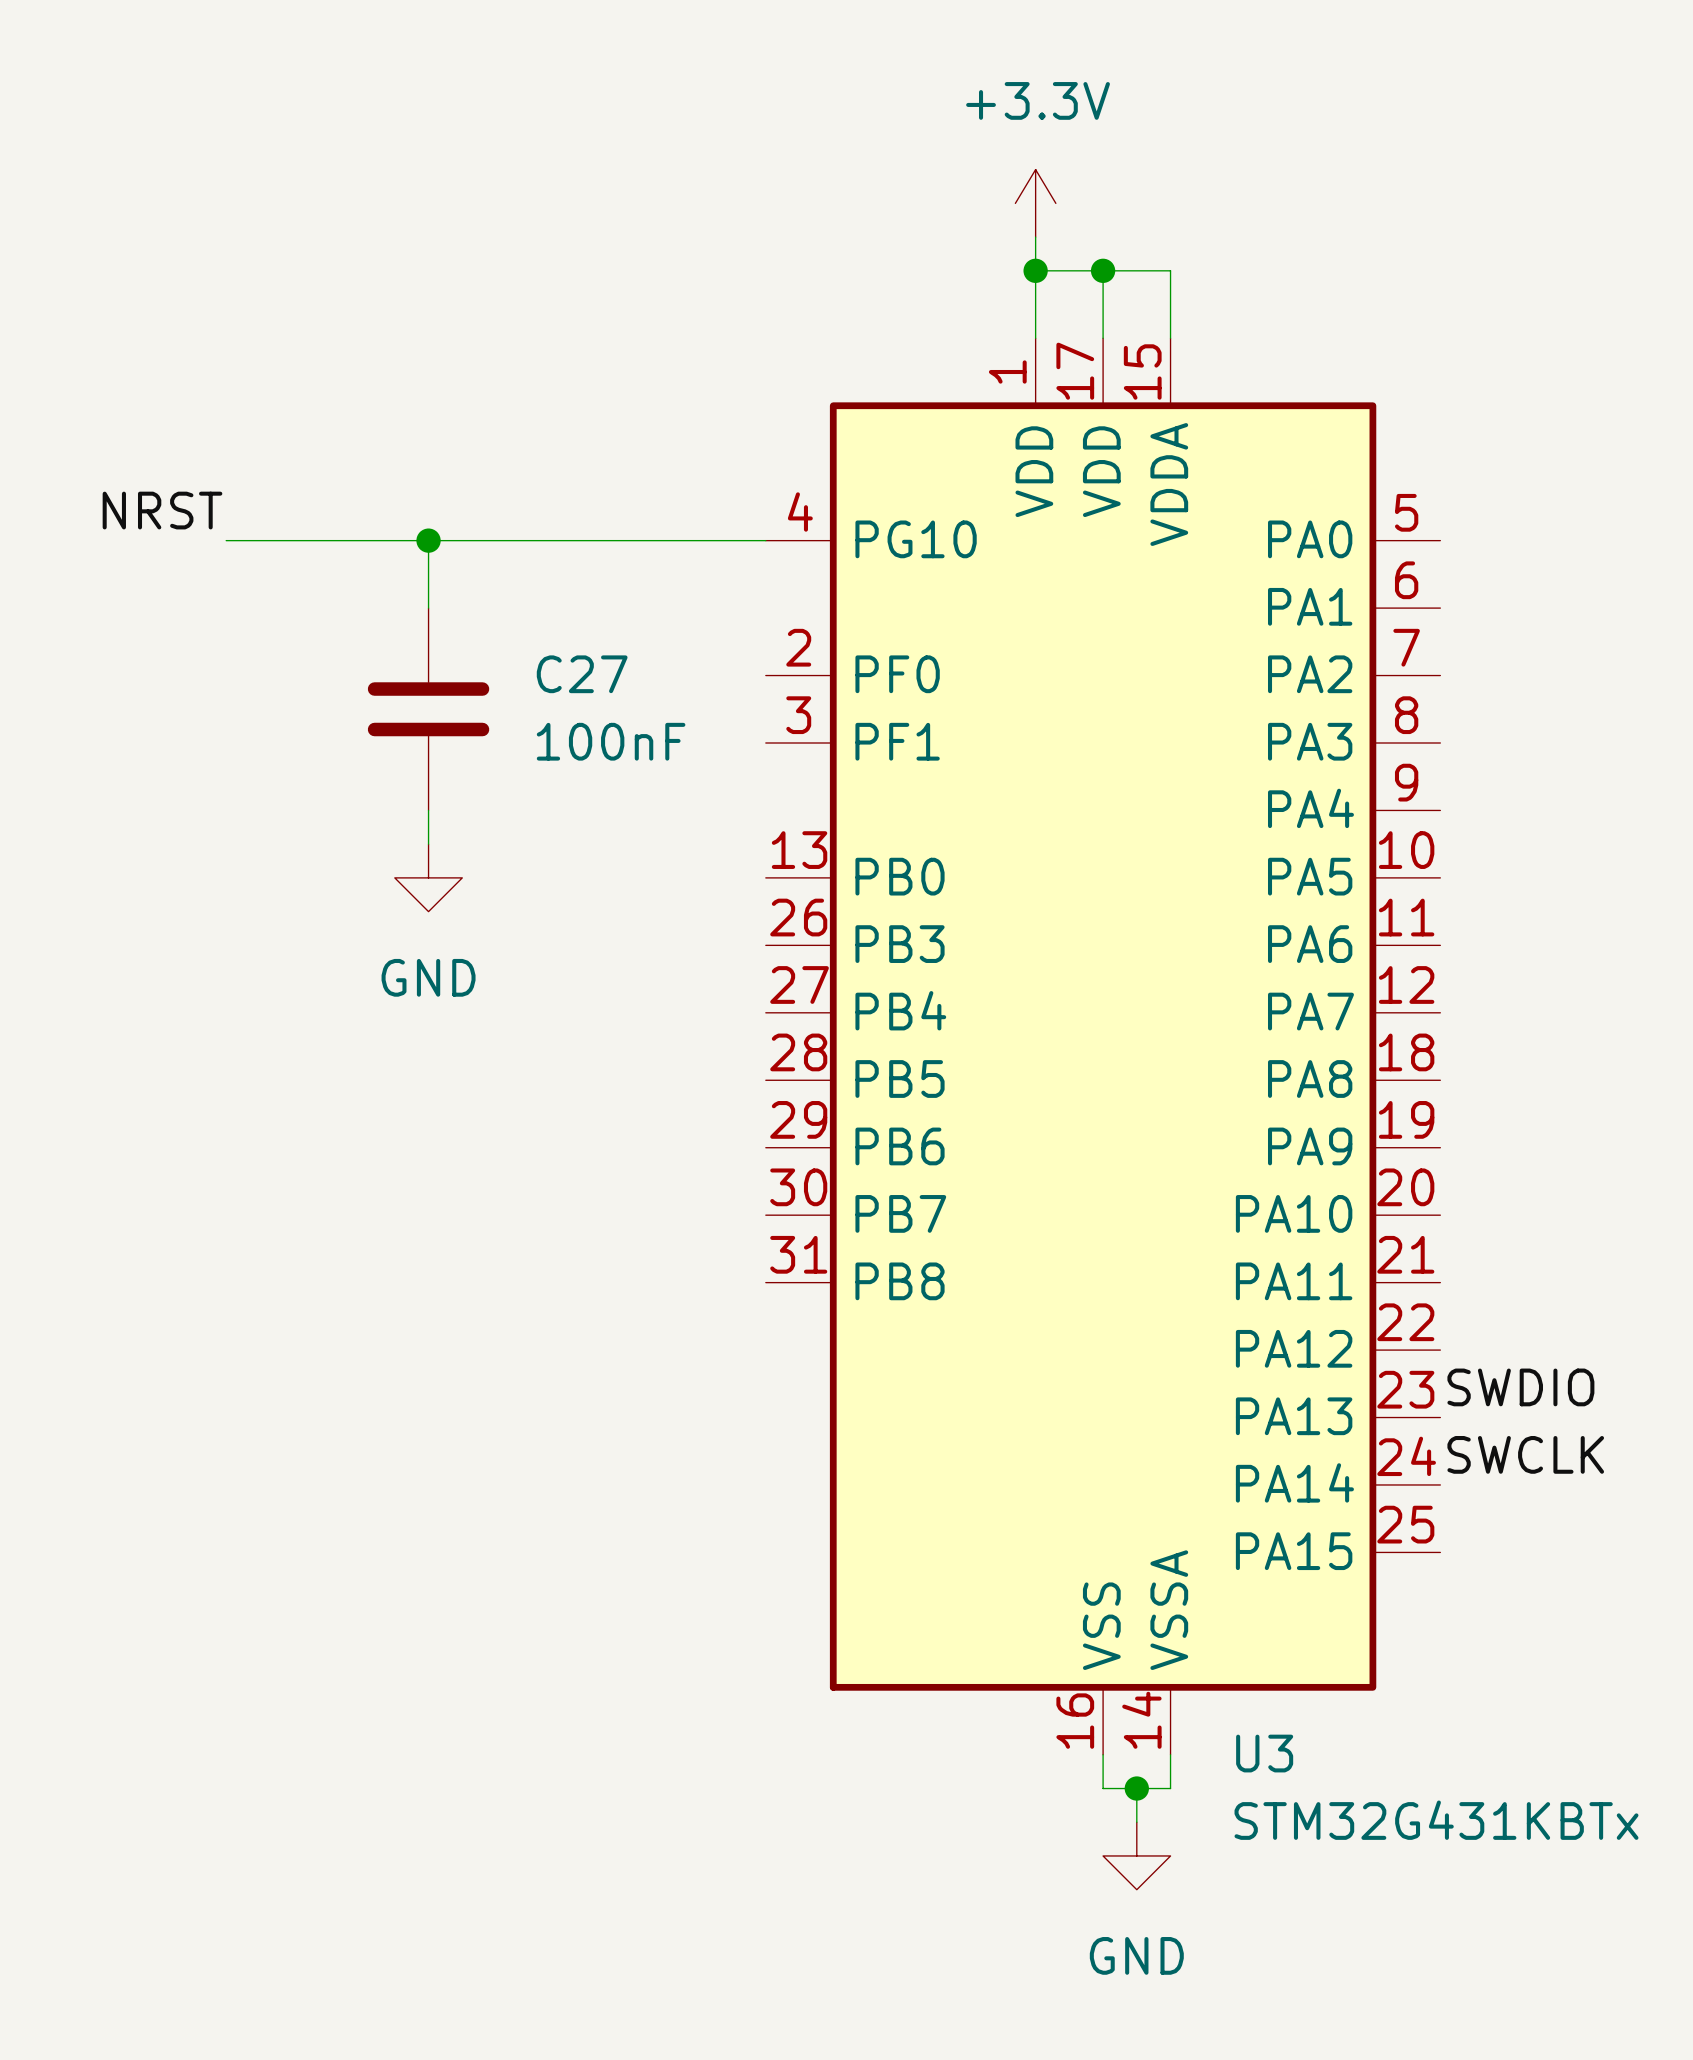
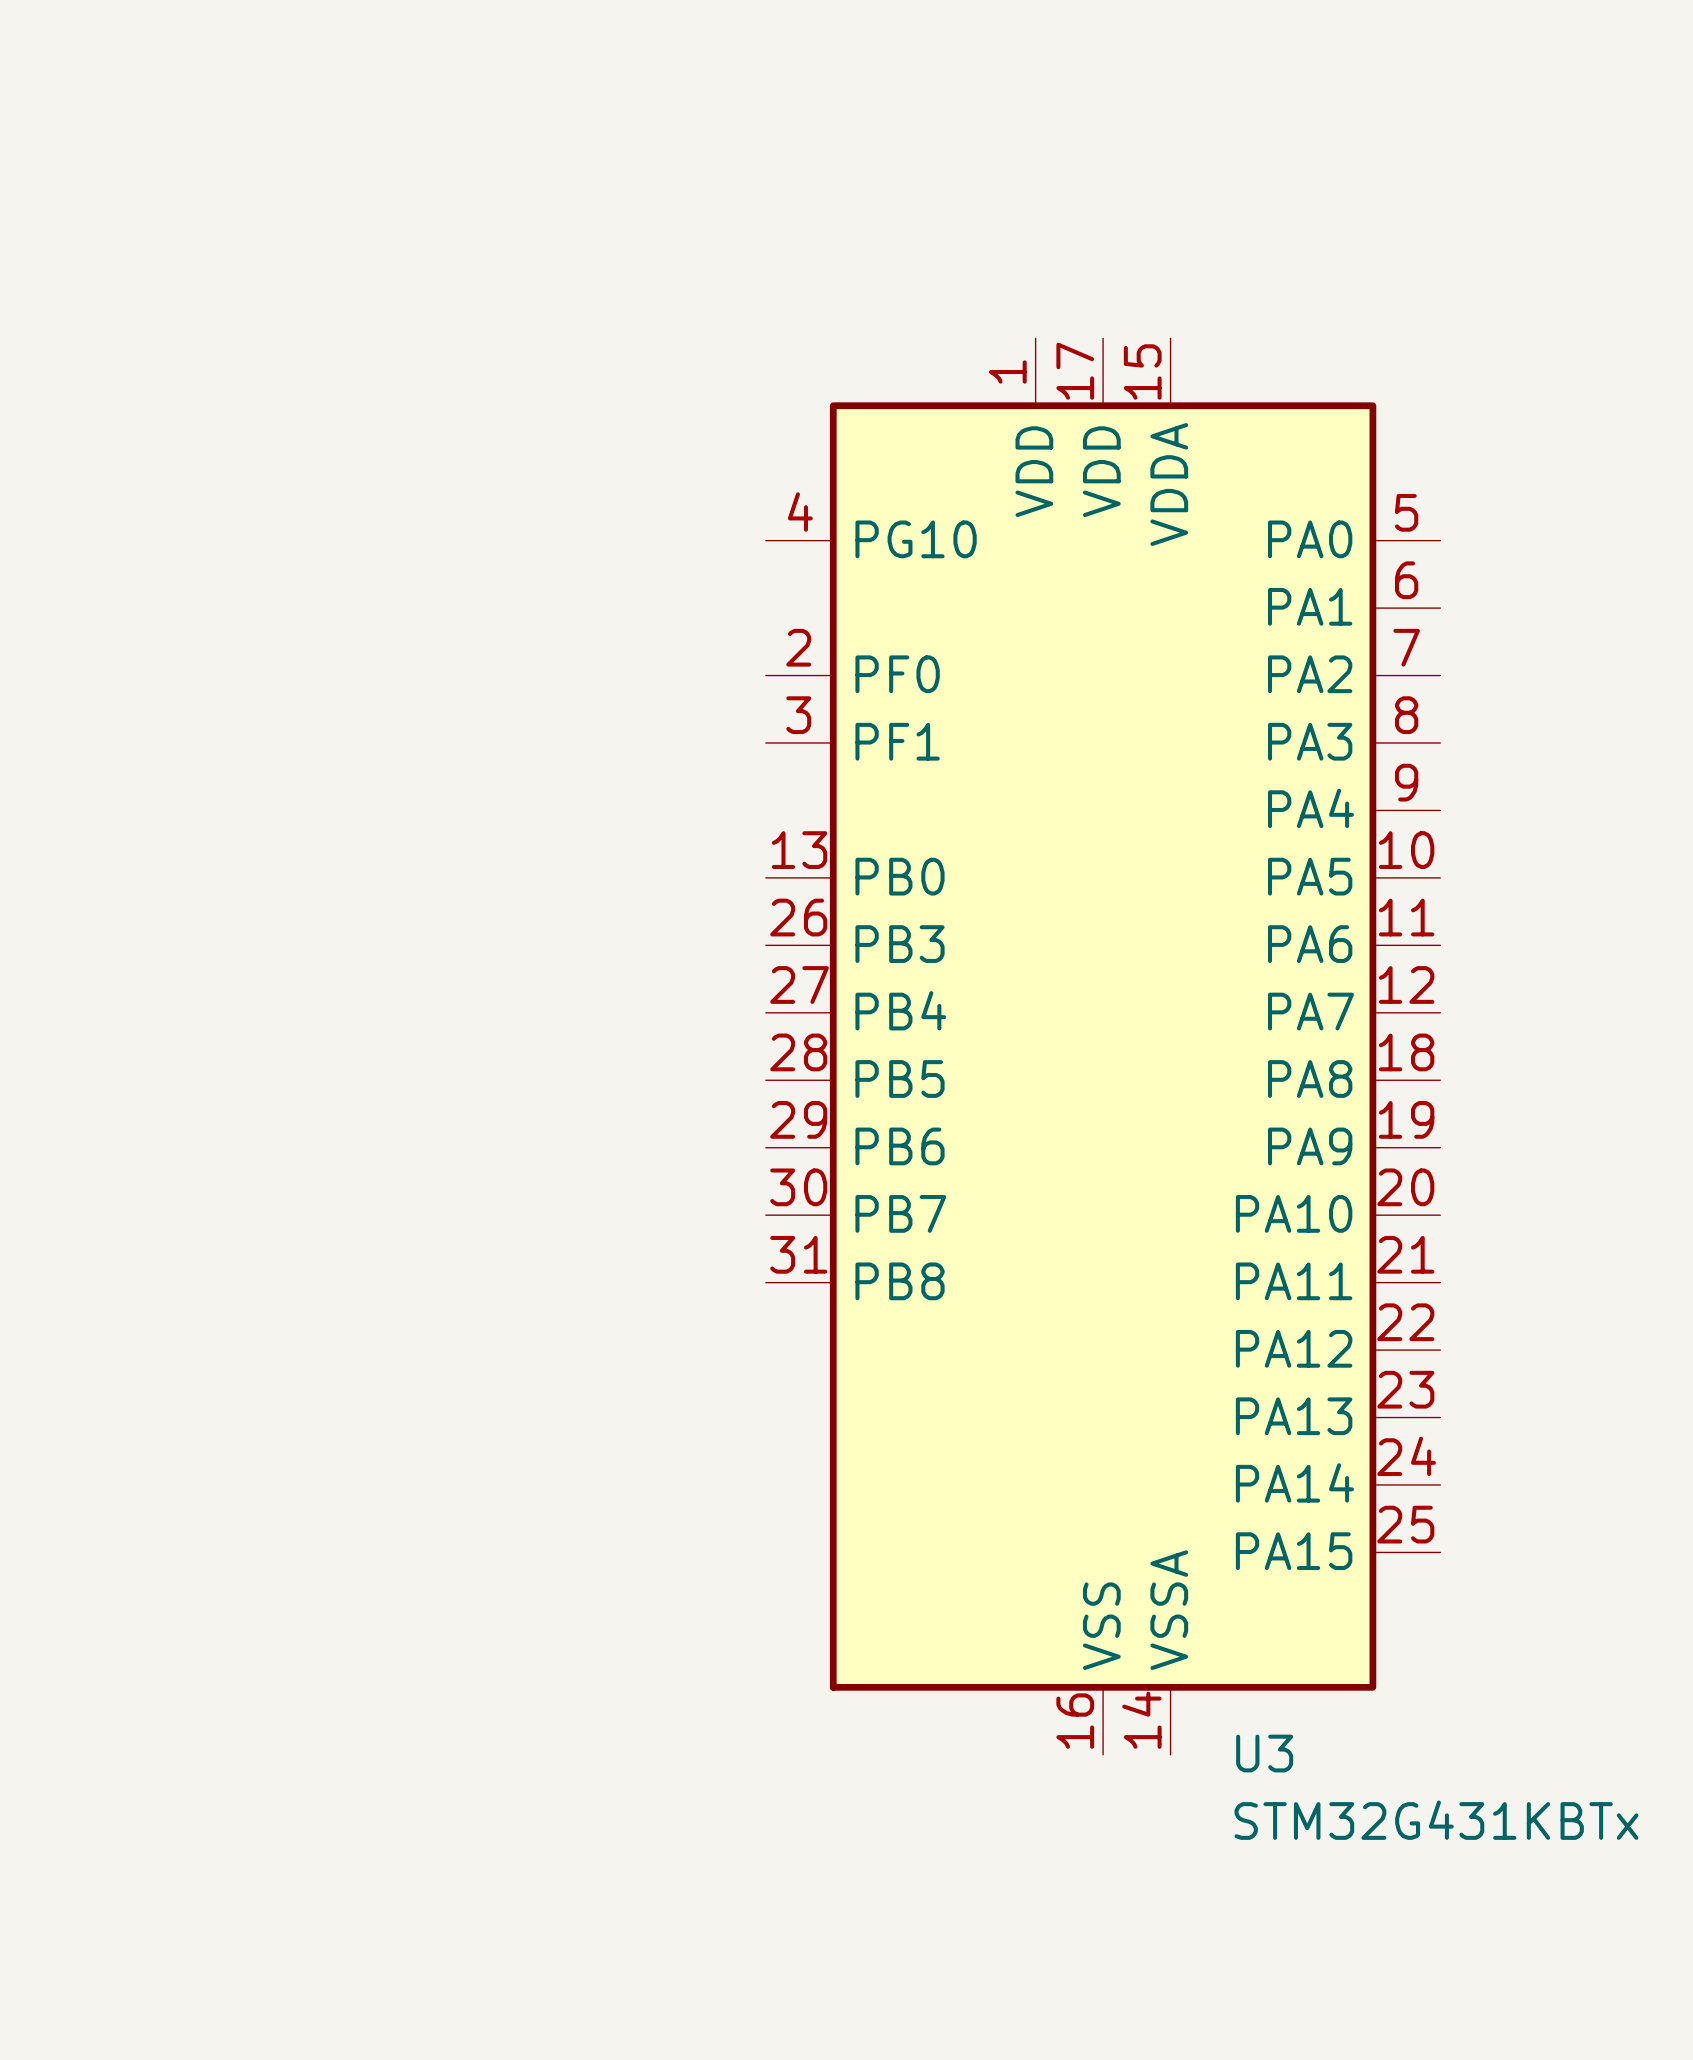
power symbol: +3.3V (1035, 203) -> none
wire: (1035, 237) (1035, 338) -> none
wire: (1035, 270) (1170, 270) (1170, 338) -> none
junction: (1035, 270) -> none
wire: (1103, 270) (1103, 338) -> none
junction: (1103, 270) -> none
label: NRST (162, 510) -> none
wire: (226, 540) (765, 540) -> none
wire: (428, 540) (428, 608) -> none
junction: (428, 540) -> none
C27: 100nF (428, 709) -> none
wire: (428, 810) (428, 844) -> none
power symbol: GND (428, 877) -> none
label: SWDIO (1520, 1387) -> none
label: SWCLK (1525, 1454) -> none
wire: (1103, 1754) (1103, 1788) (1170, 1788) (1170, 1754) -> none
wire: (1136, 1788) (1136, 1822) -> none
junction: (1136, 1788) -> none
power symbol: GND (1136, 1855) -> none

